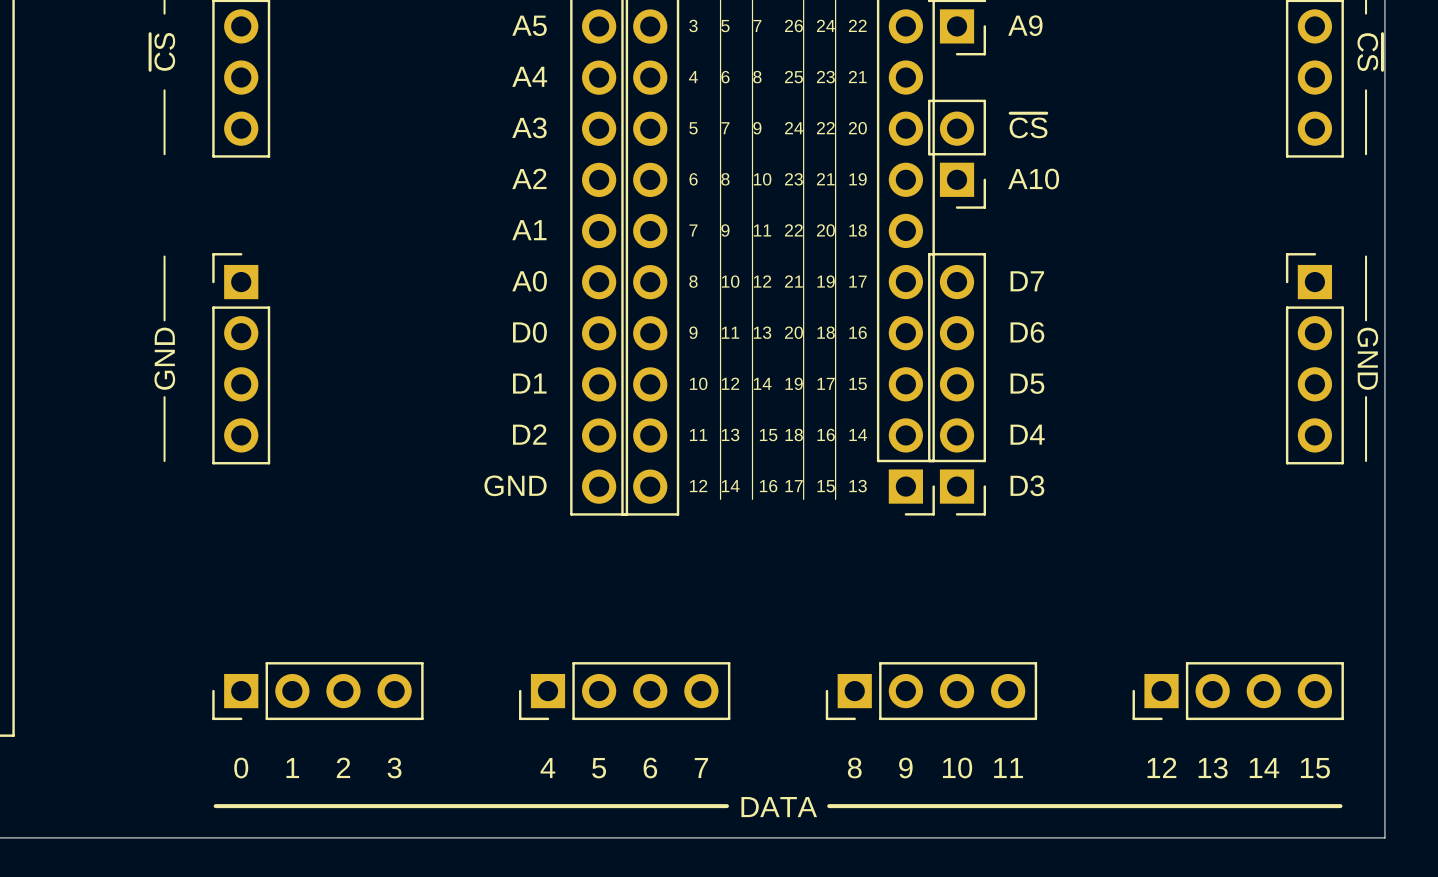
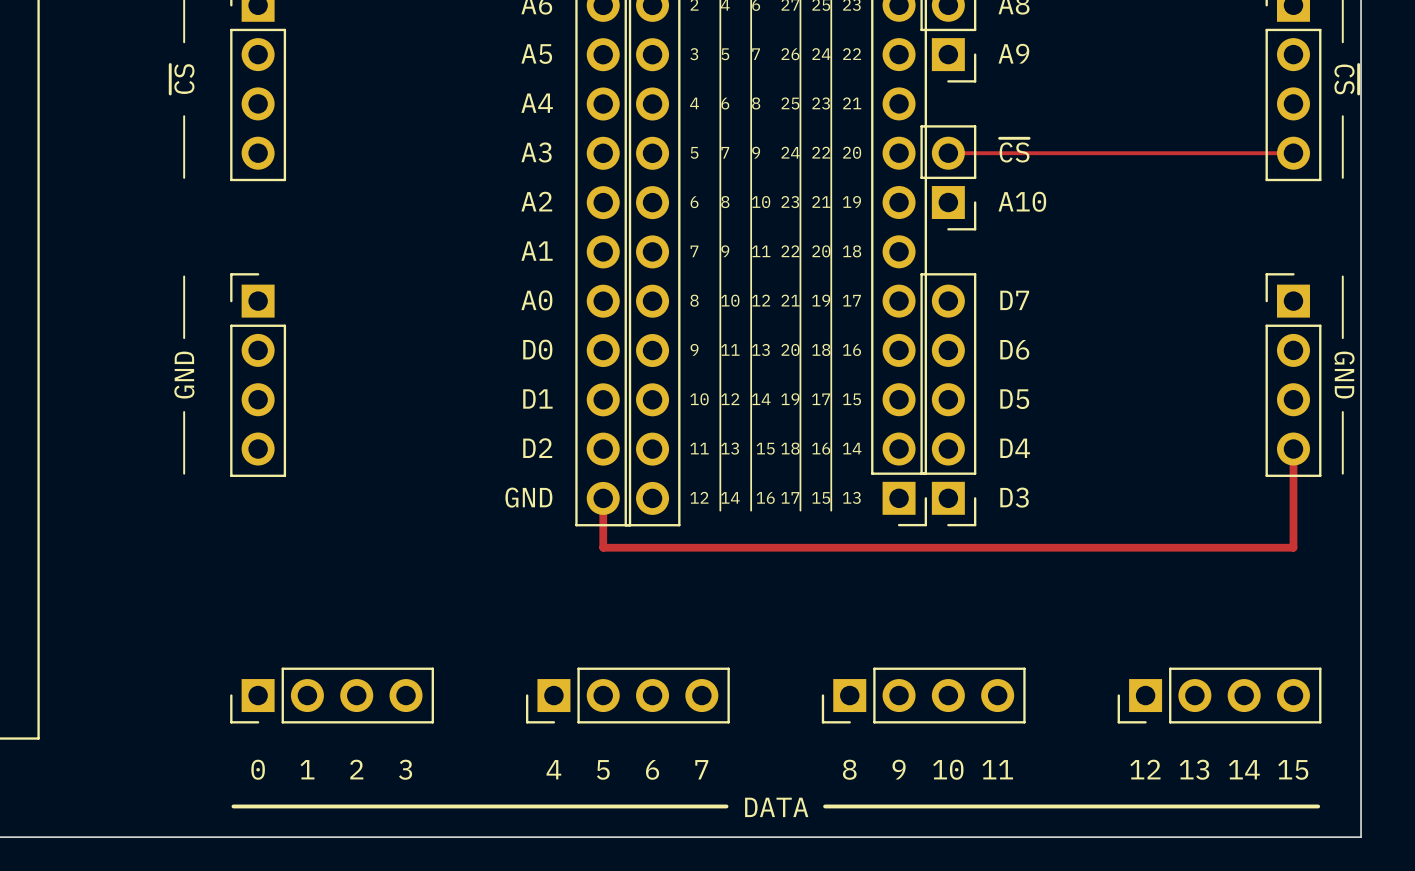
track: none -> (948, 153) (1293, 153)
track: none -> (1293, 449) (1293, 547) (603, 547) (603, 498)

